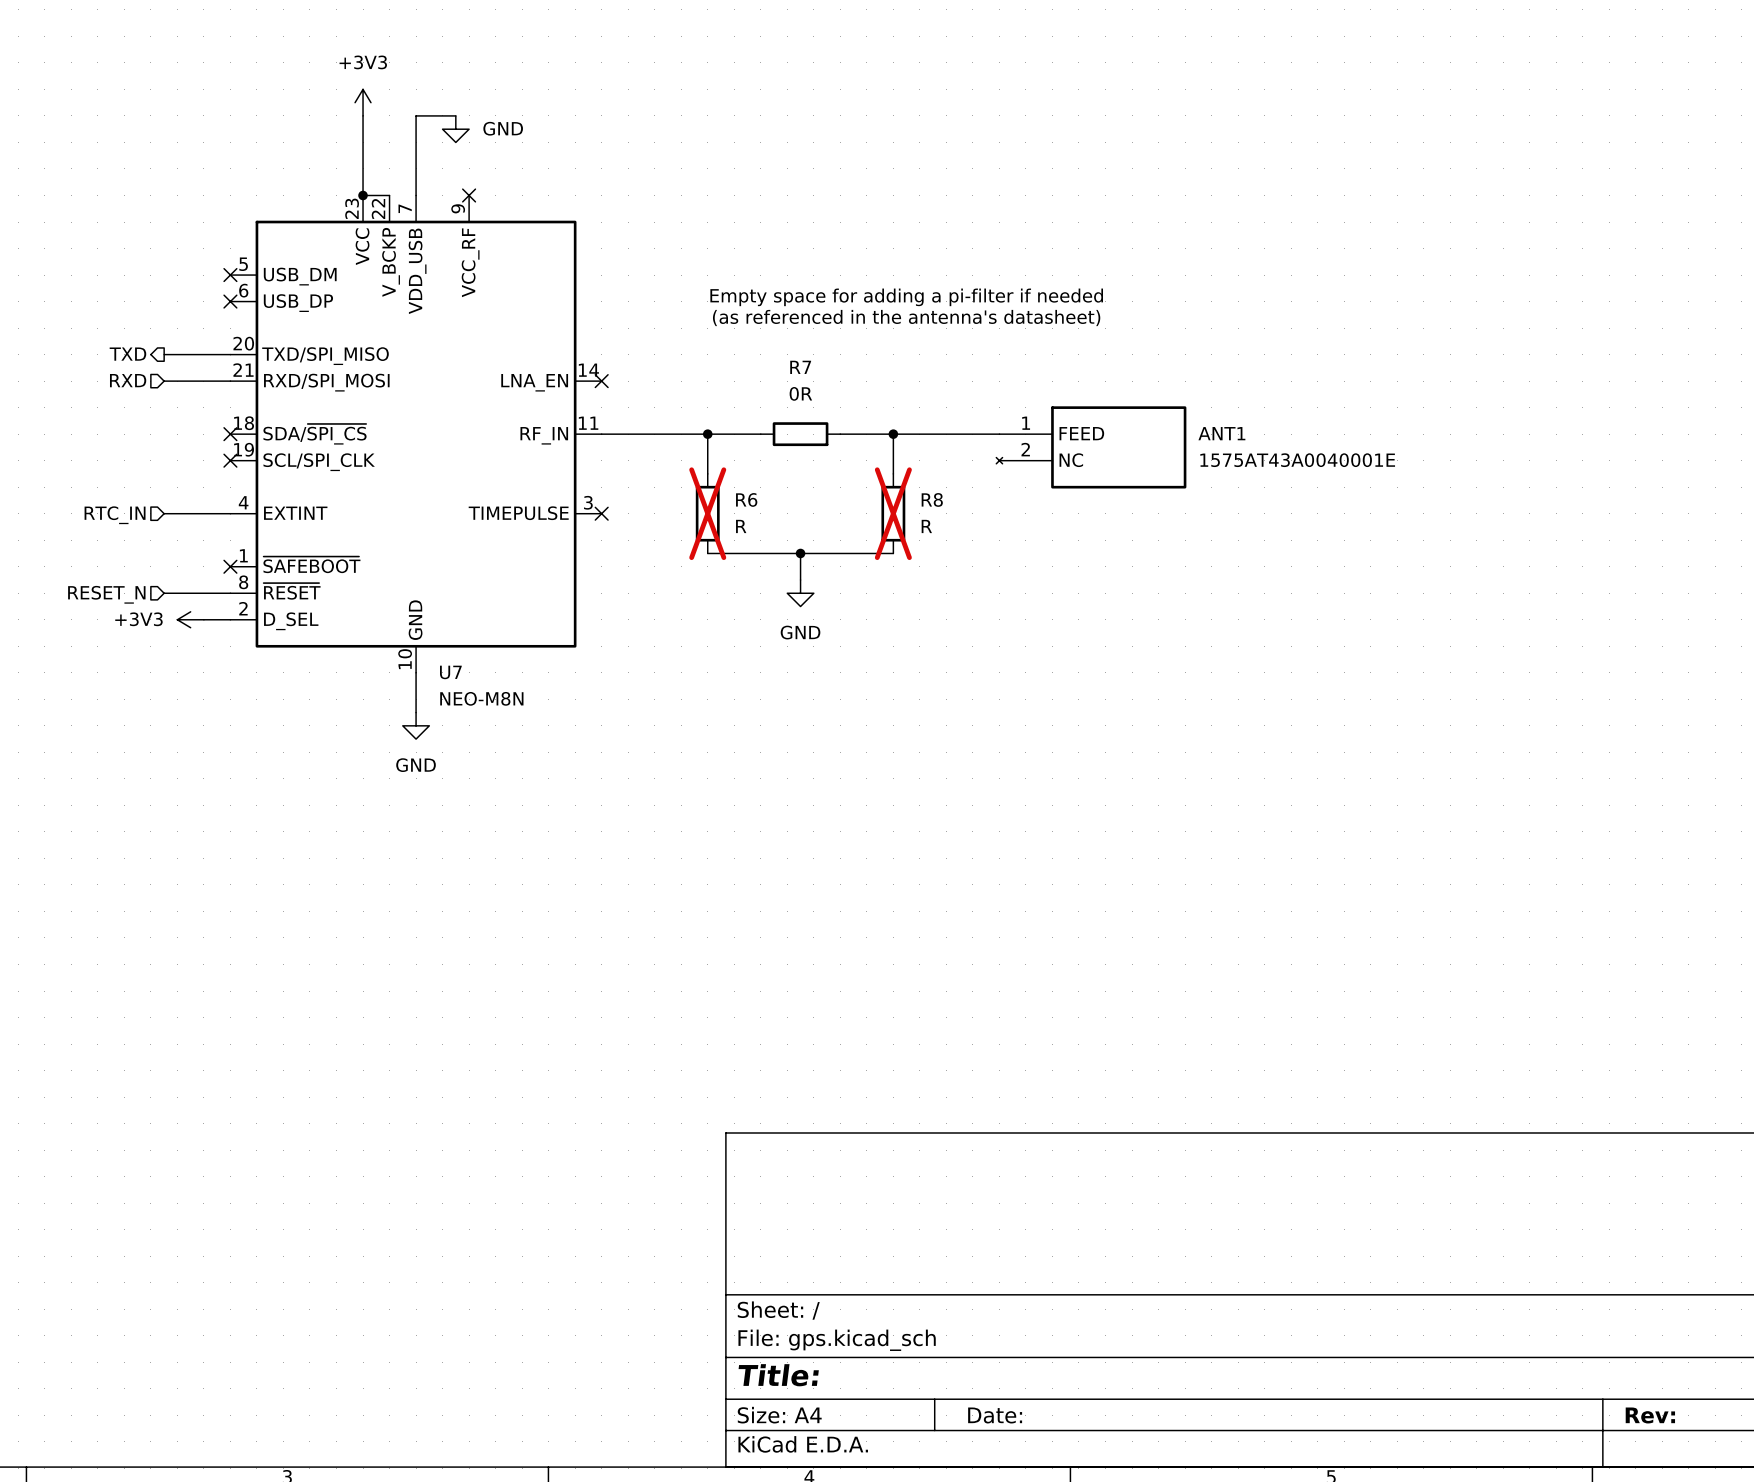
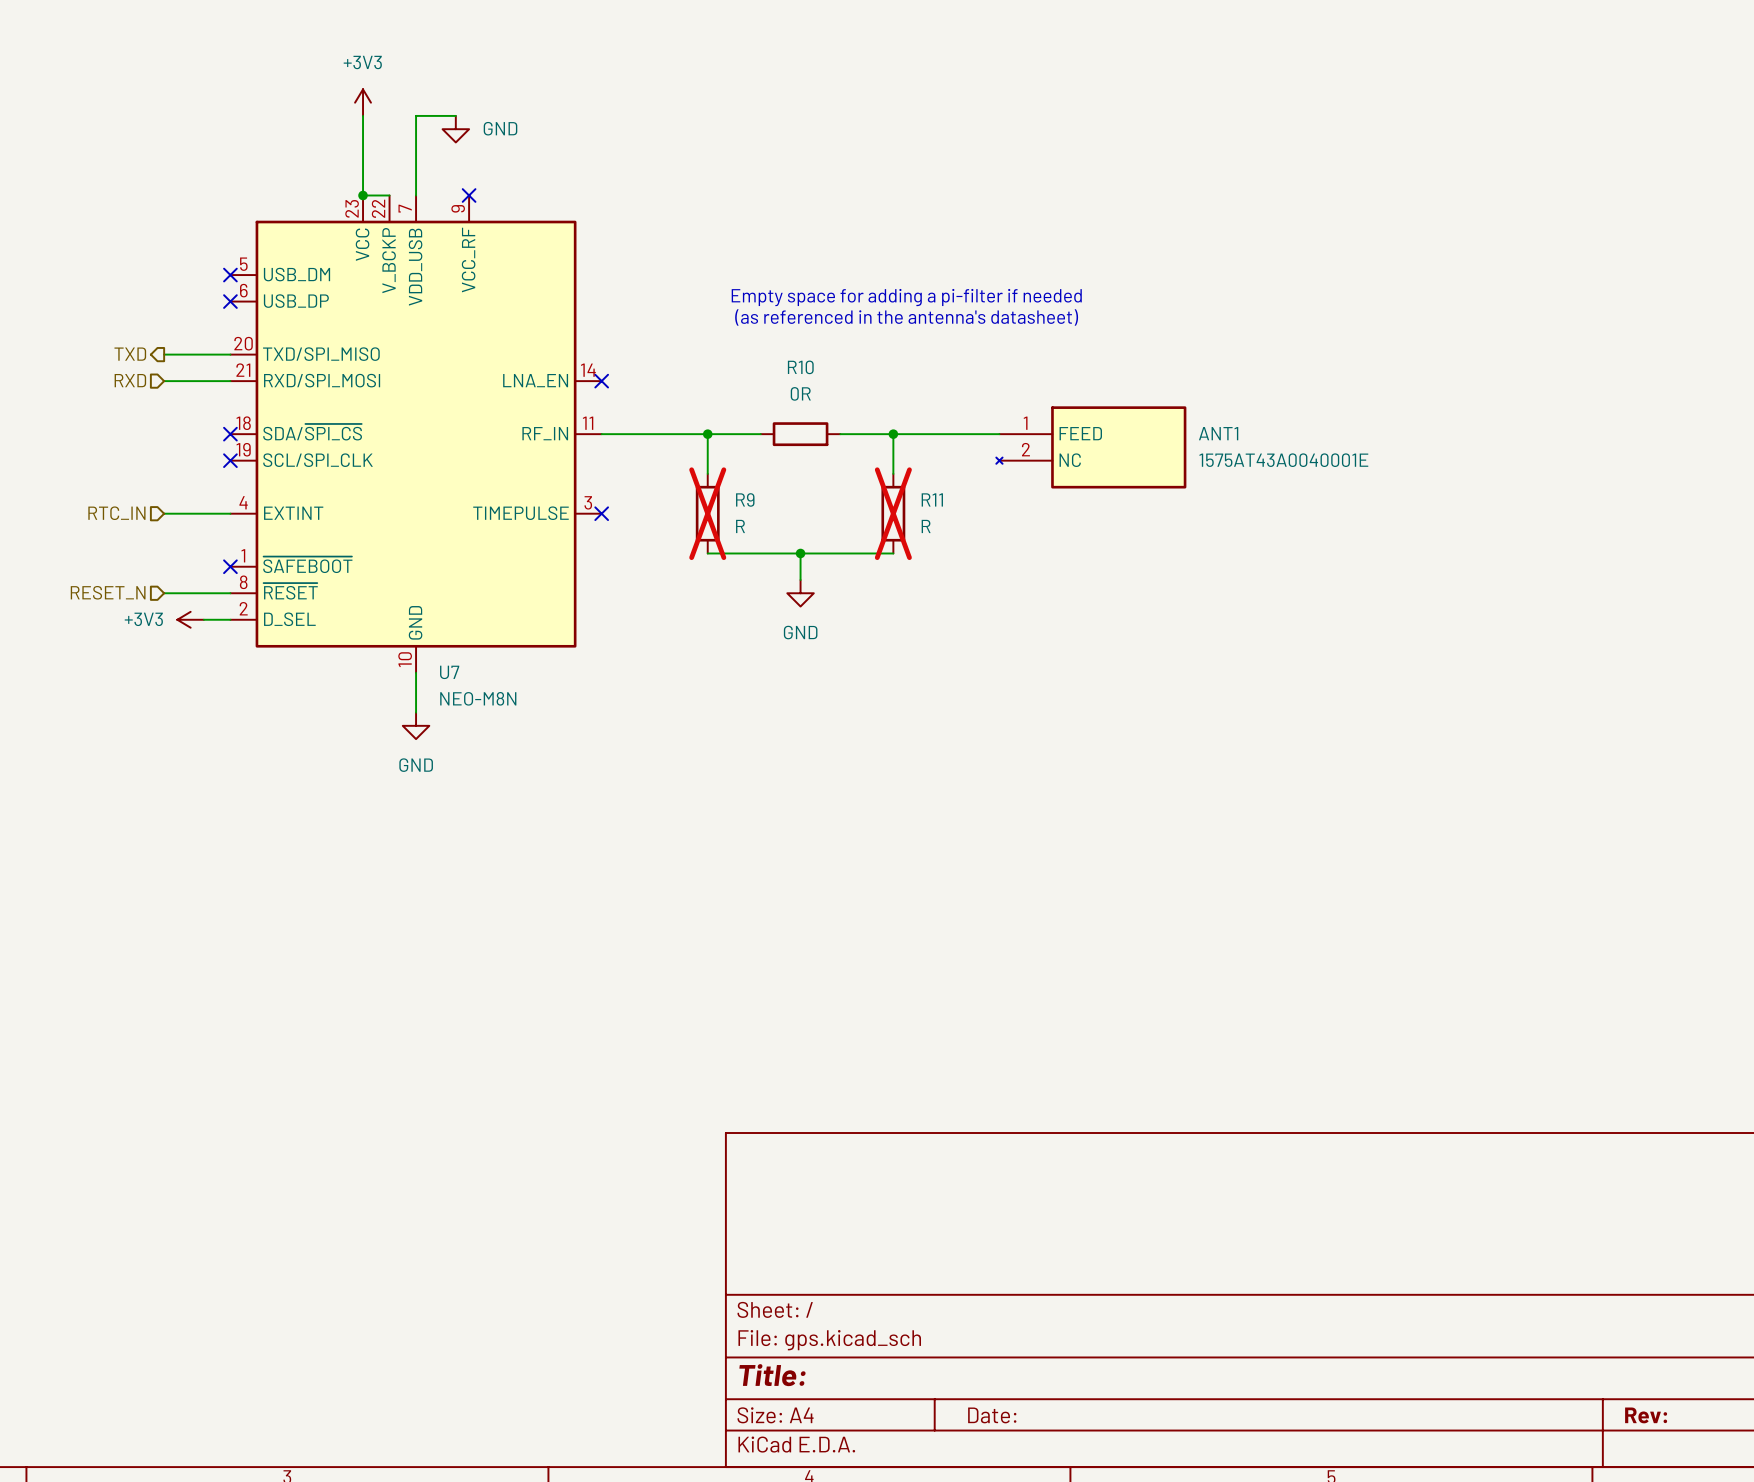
R7 name: R7 (800, 367) -> R10 (800, 367)
R6 name: R6 (746, 499) -> R9 (745, 499)
R8 name: R8 (932, 499) -> R11 (932, 499)

